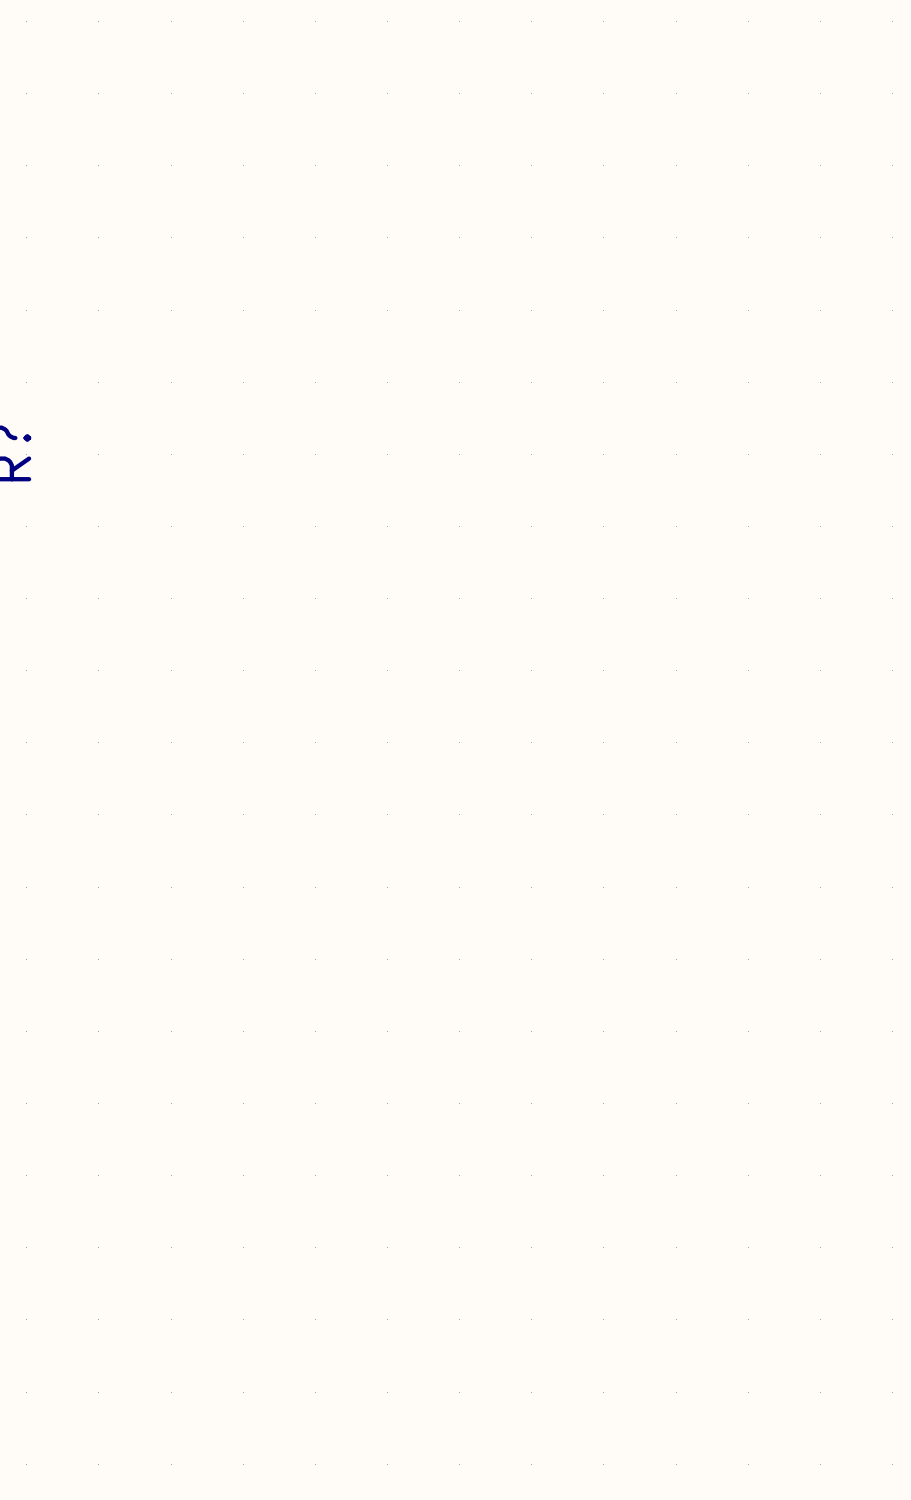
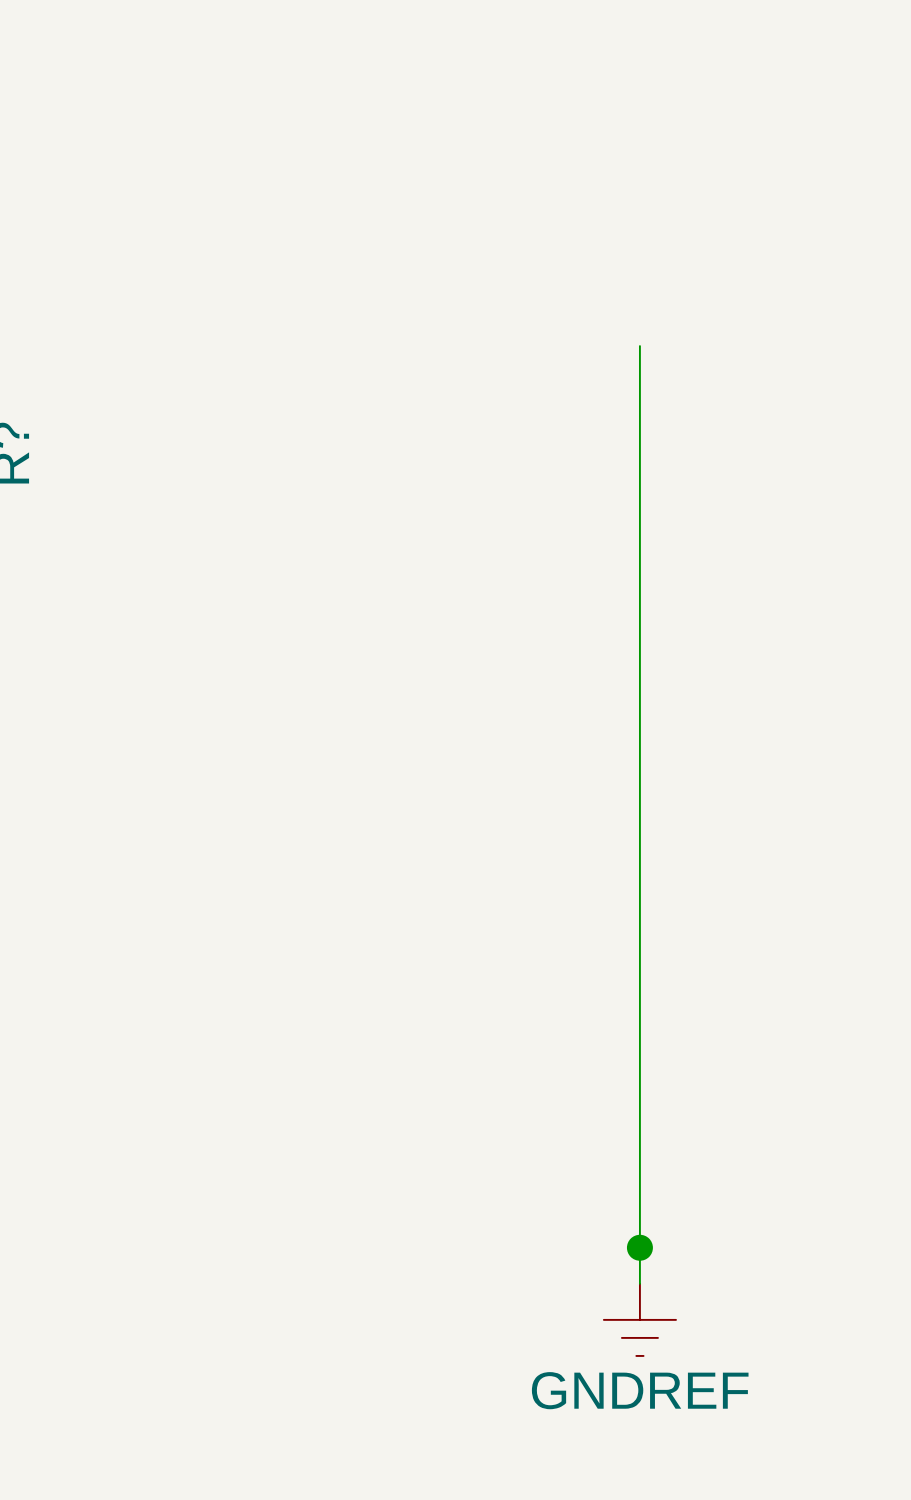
wire: none -> (639, 346) (639, 1283)
junction: none -> (639, 1247)
power symbol: none -> GNDREF (639, 1319)

